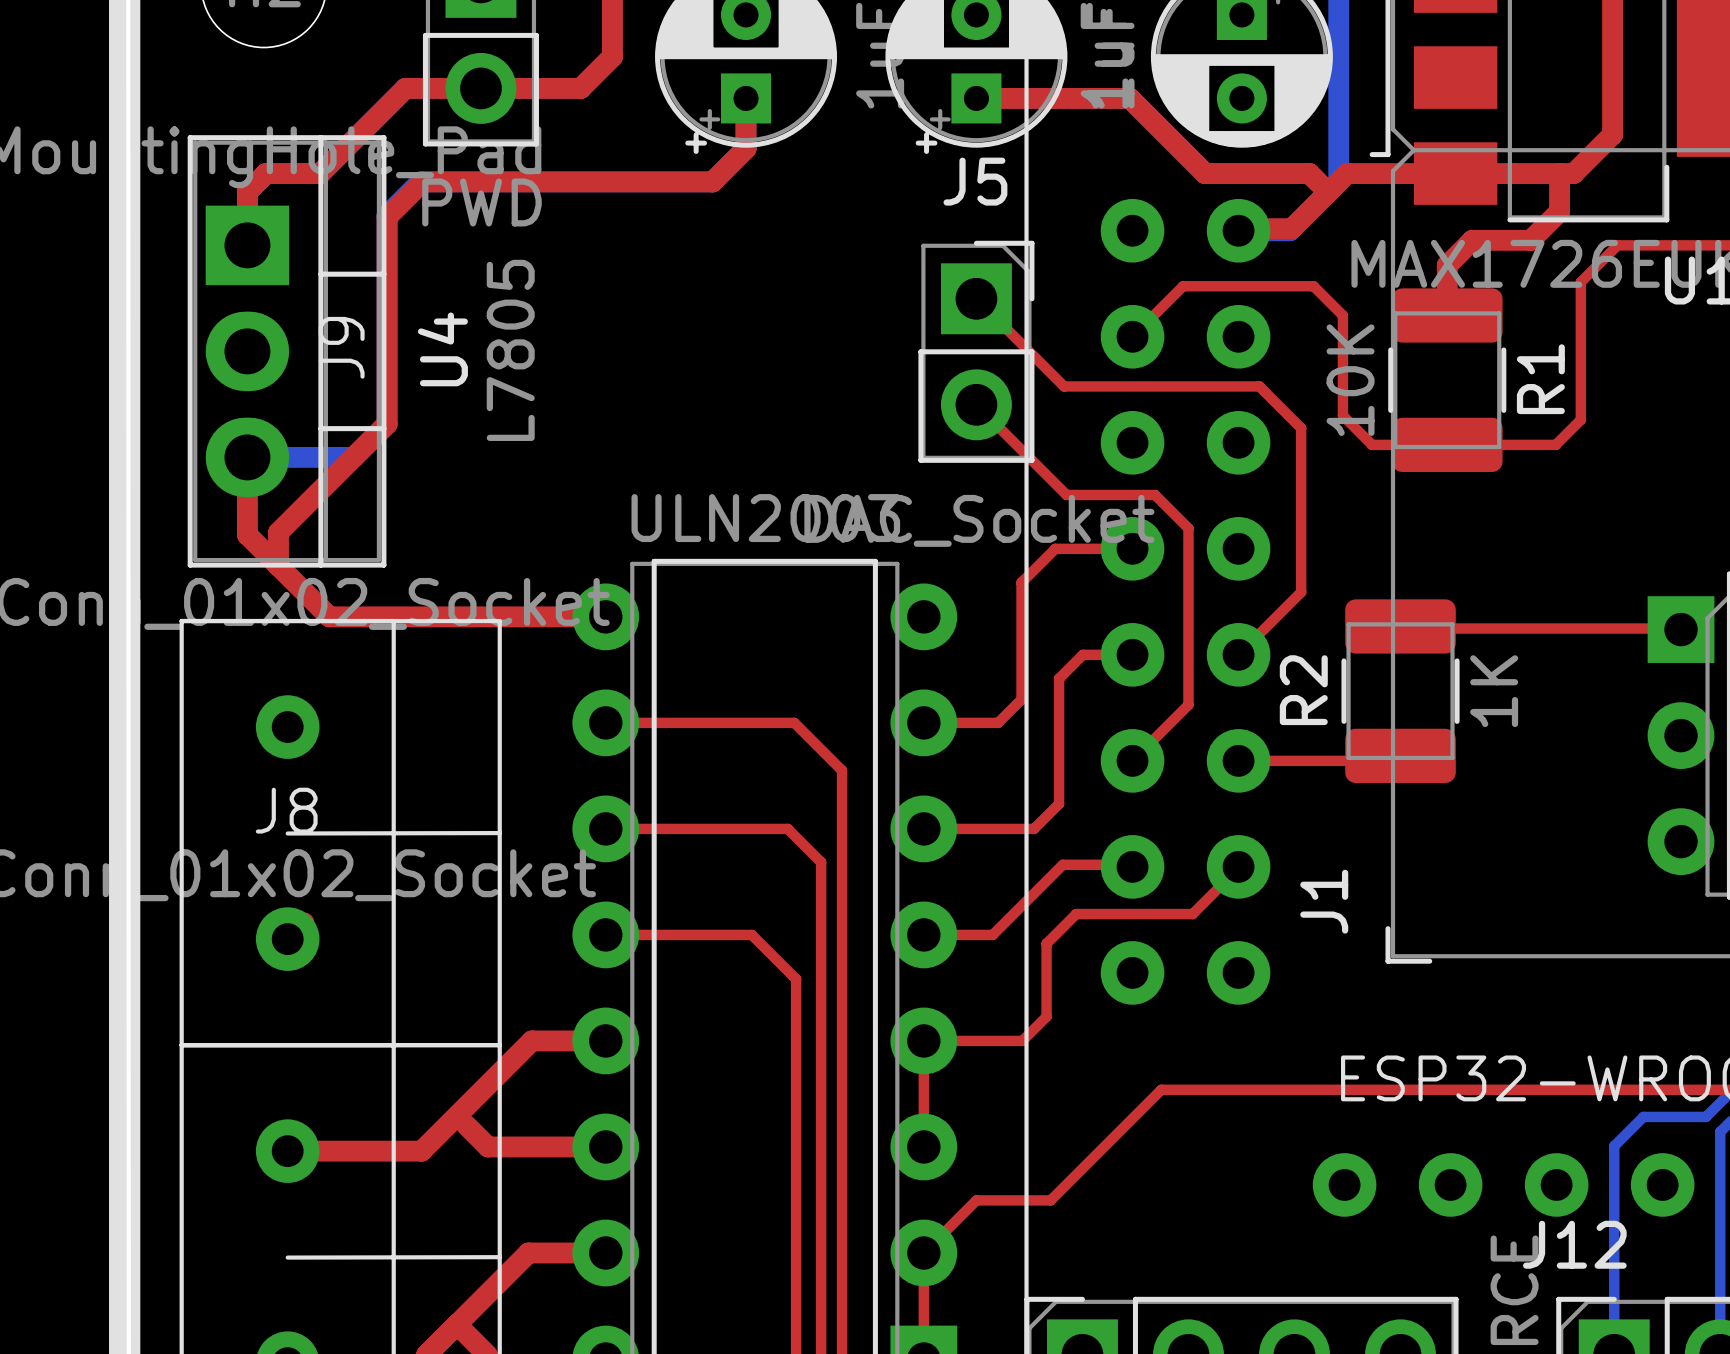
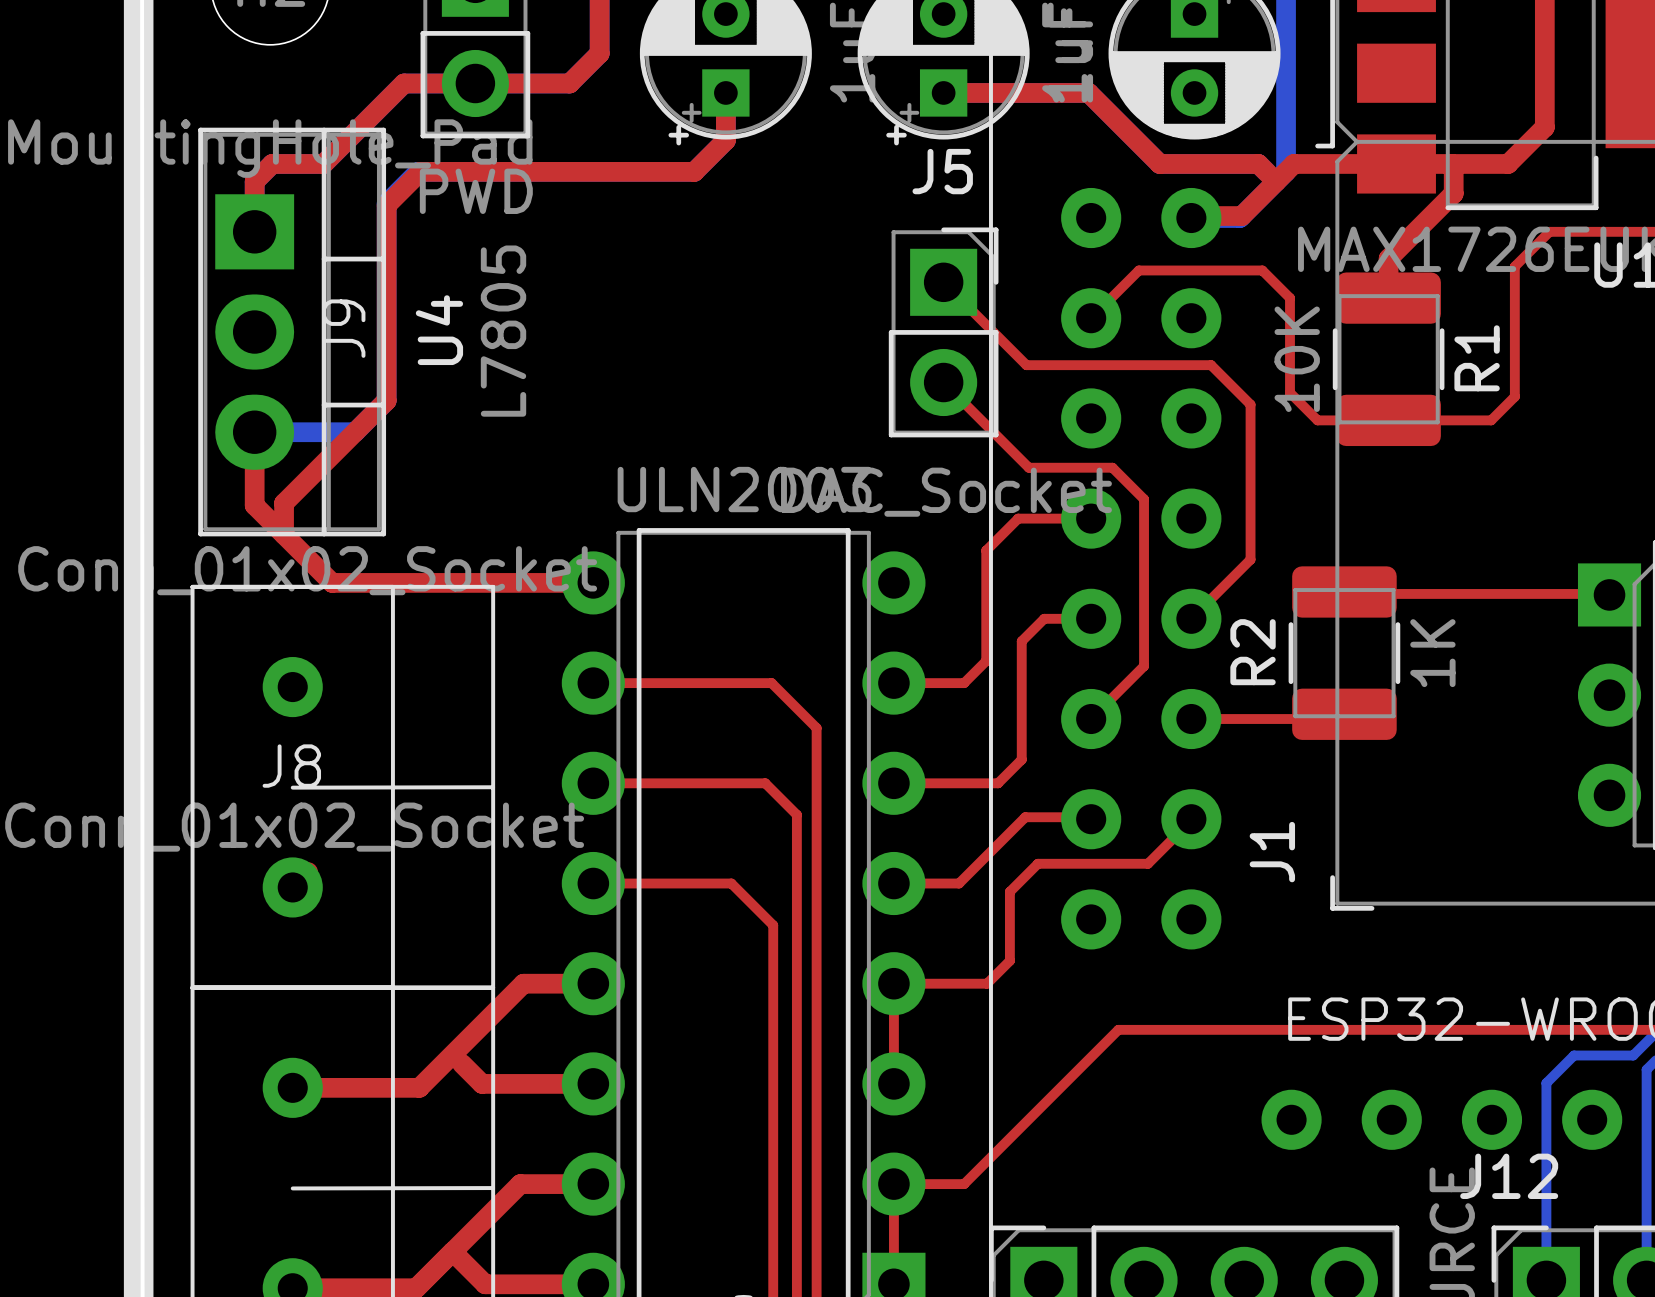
top track: (1559, 173) (1559, 211) (1530, 240) (1472, 240) (1447, 265) (1447, 273) -> (1451, 163) (1453, 165) (1453, 193) (1388, 258)
top track: (1050, 1200) (976, 1200) (923, 1252) -> (1013, 1134) (964, 1184) (893, 1184)

